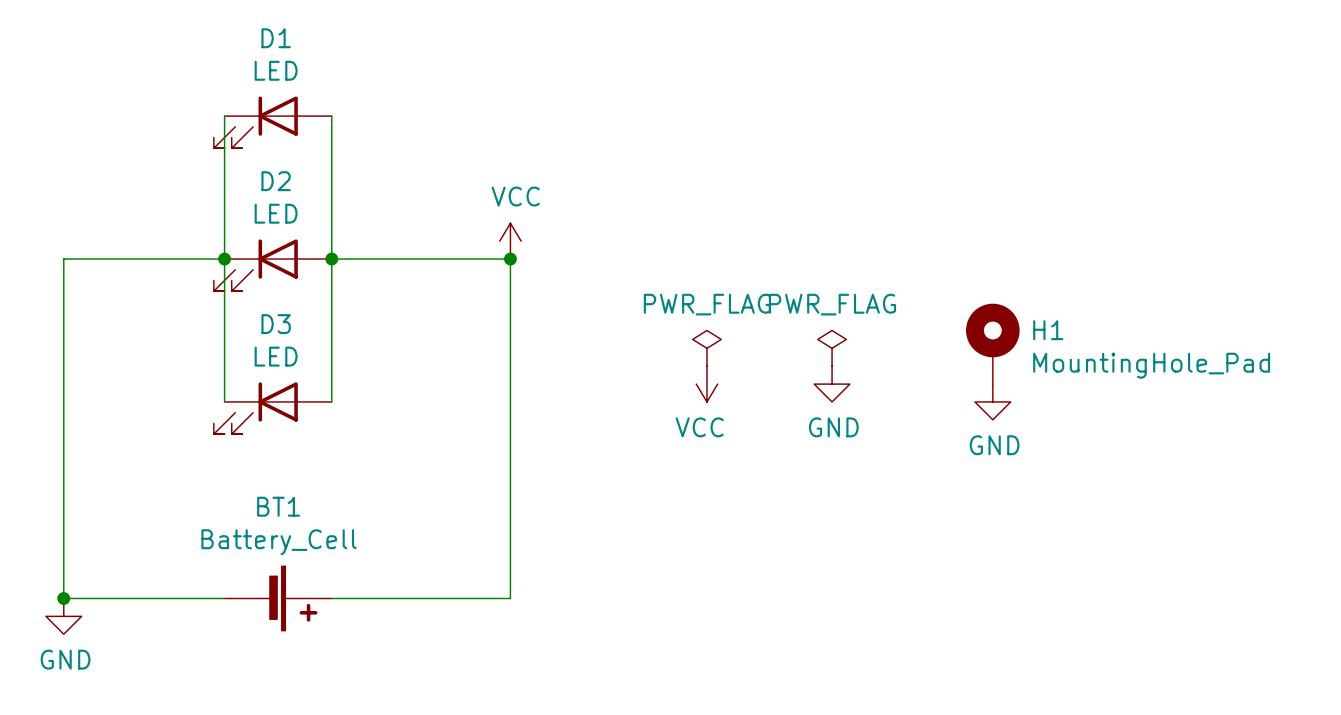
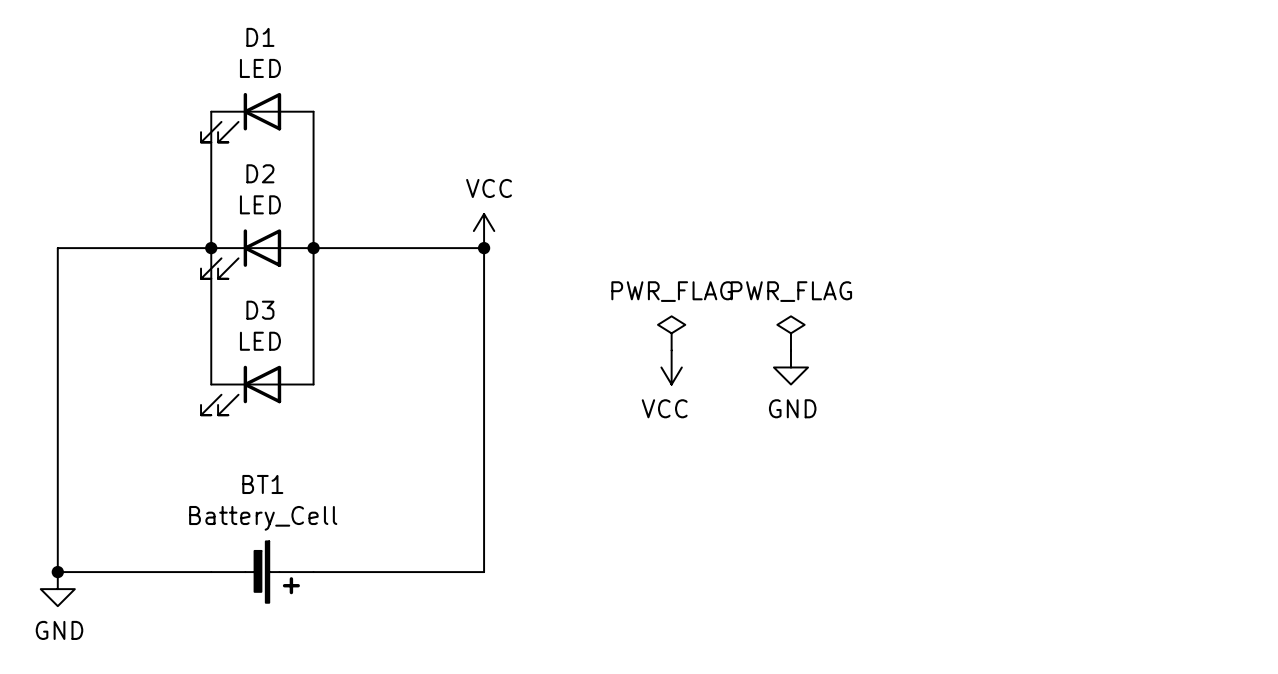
H1: MountingHole_Pad (992, 343) -> none
power symbol: GND (992, 401) -> none

